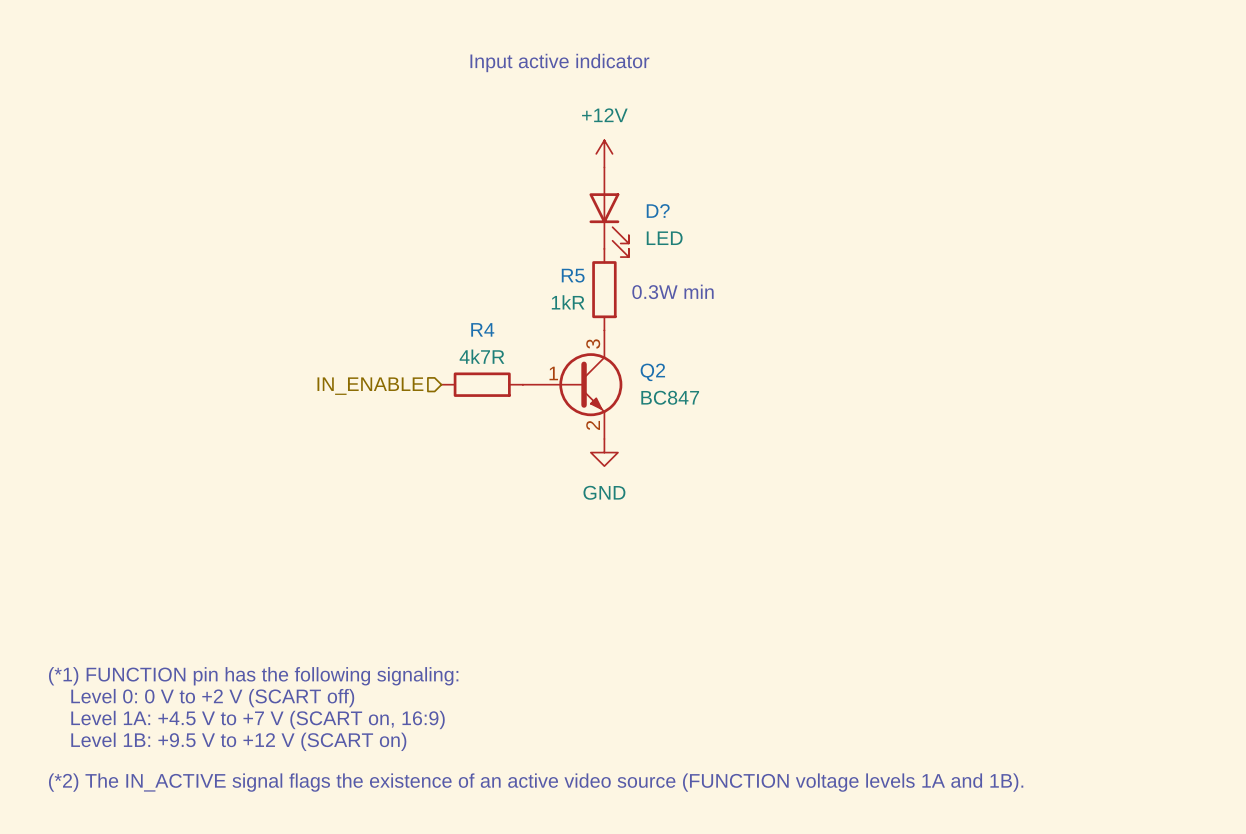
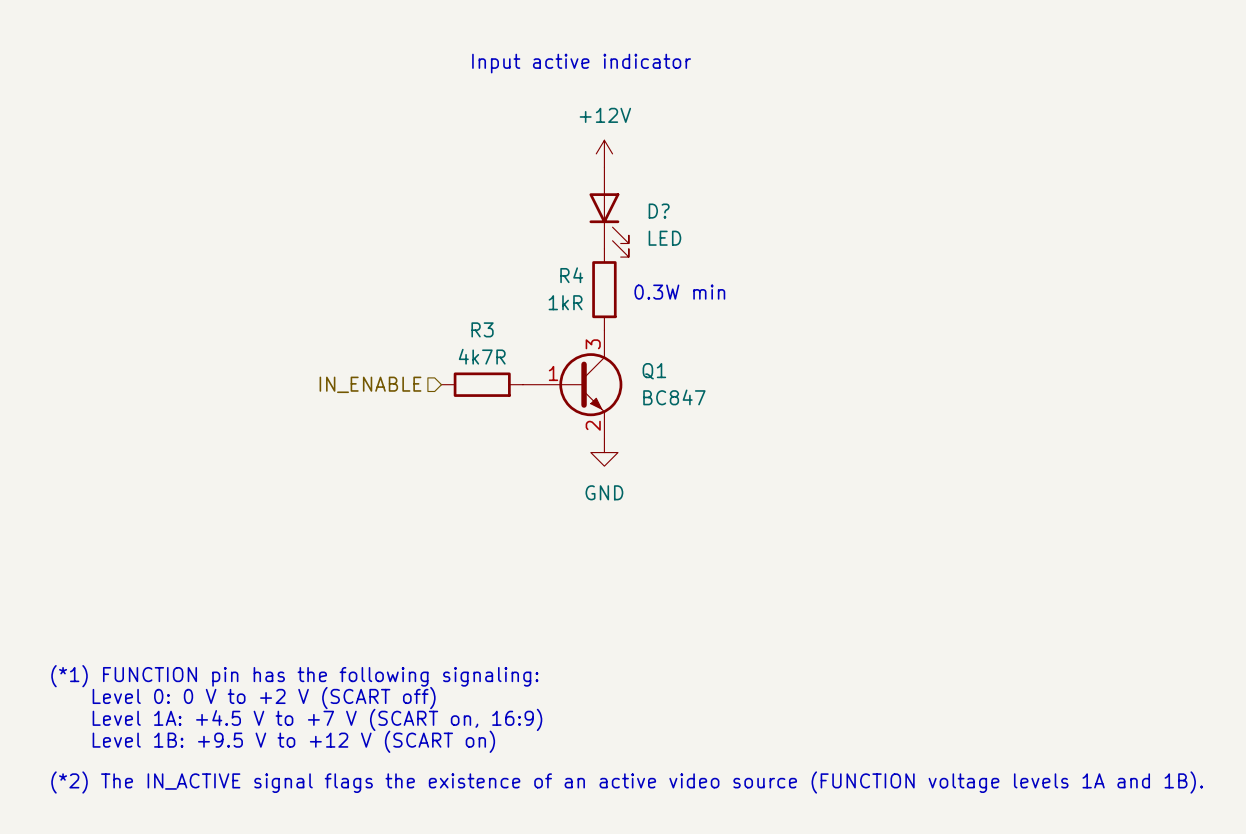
R5 name: R5 (573, 275) -> R4 (571, 275)
R4 name: R4 (482, 329) -> R3 (482, 329)
Q2 name: Q2 (652, 372) -> Q1 (654, 371)

